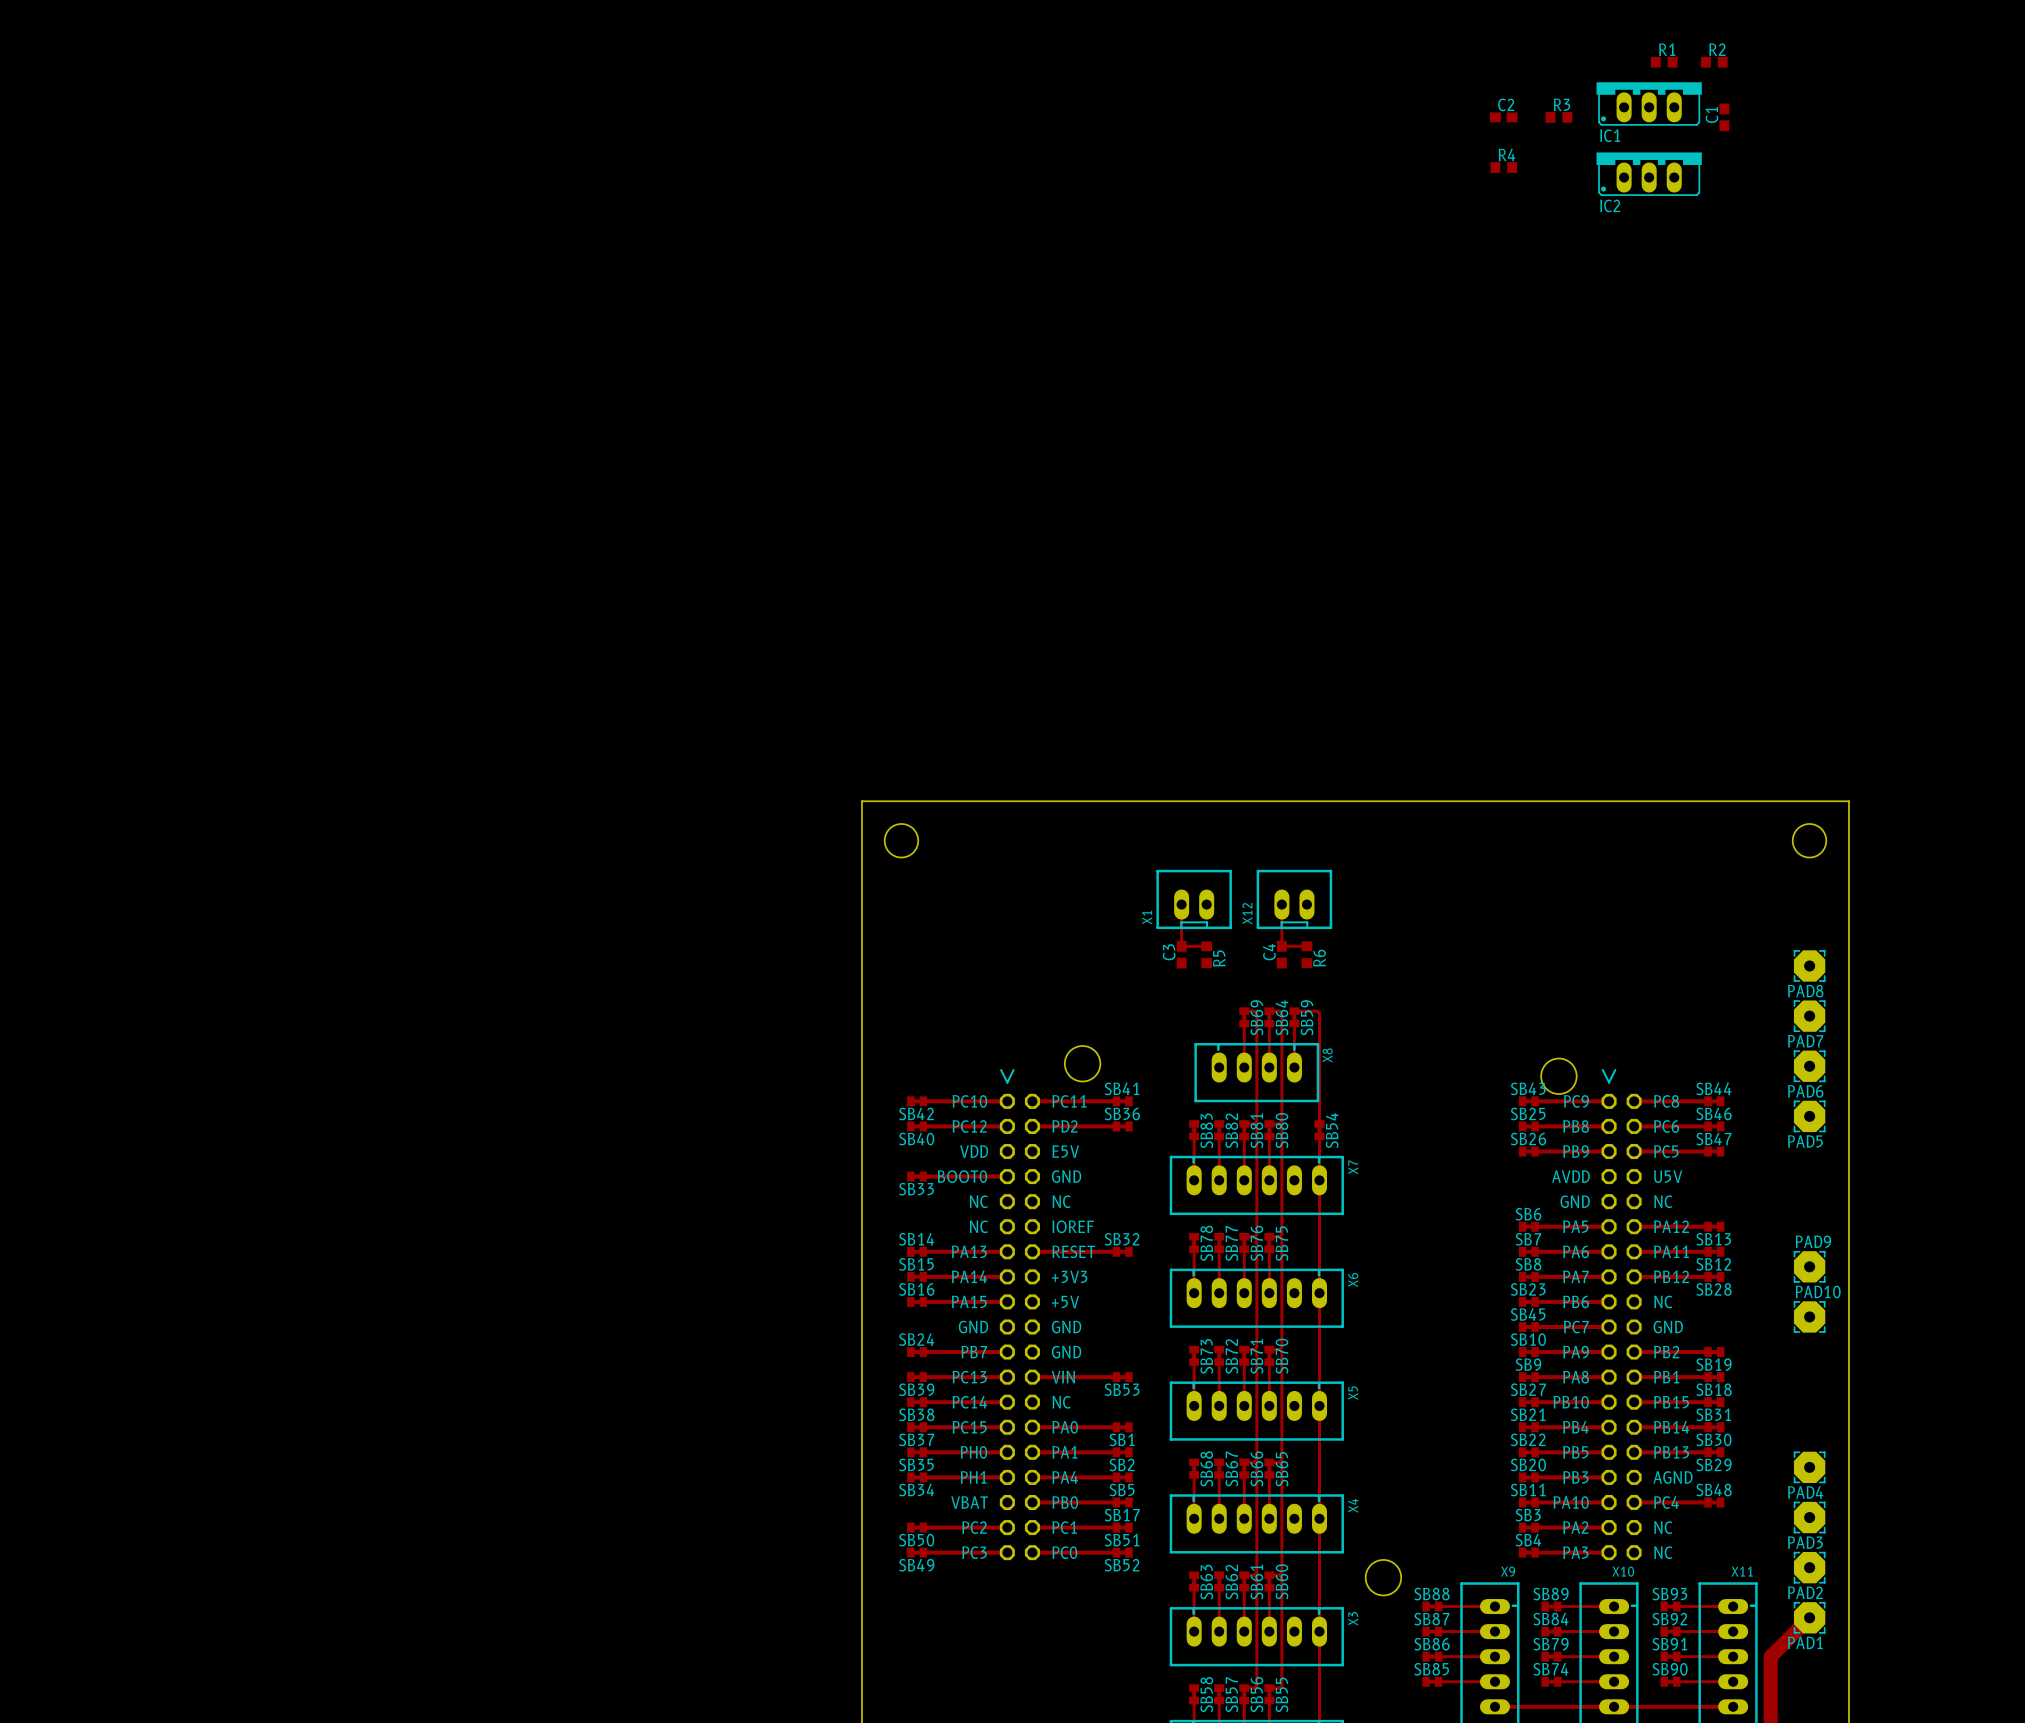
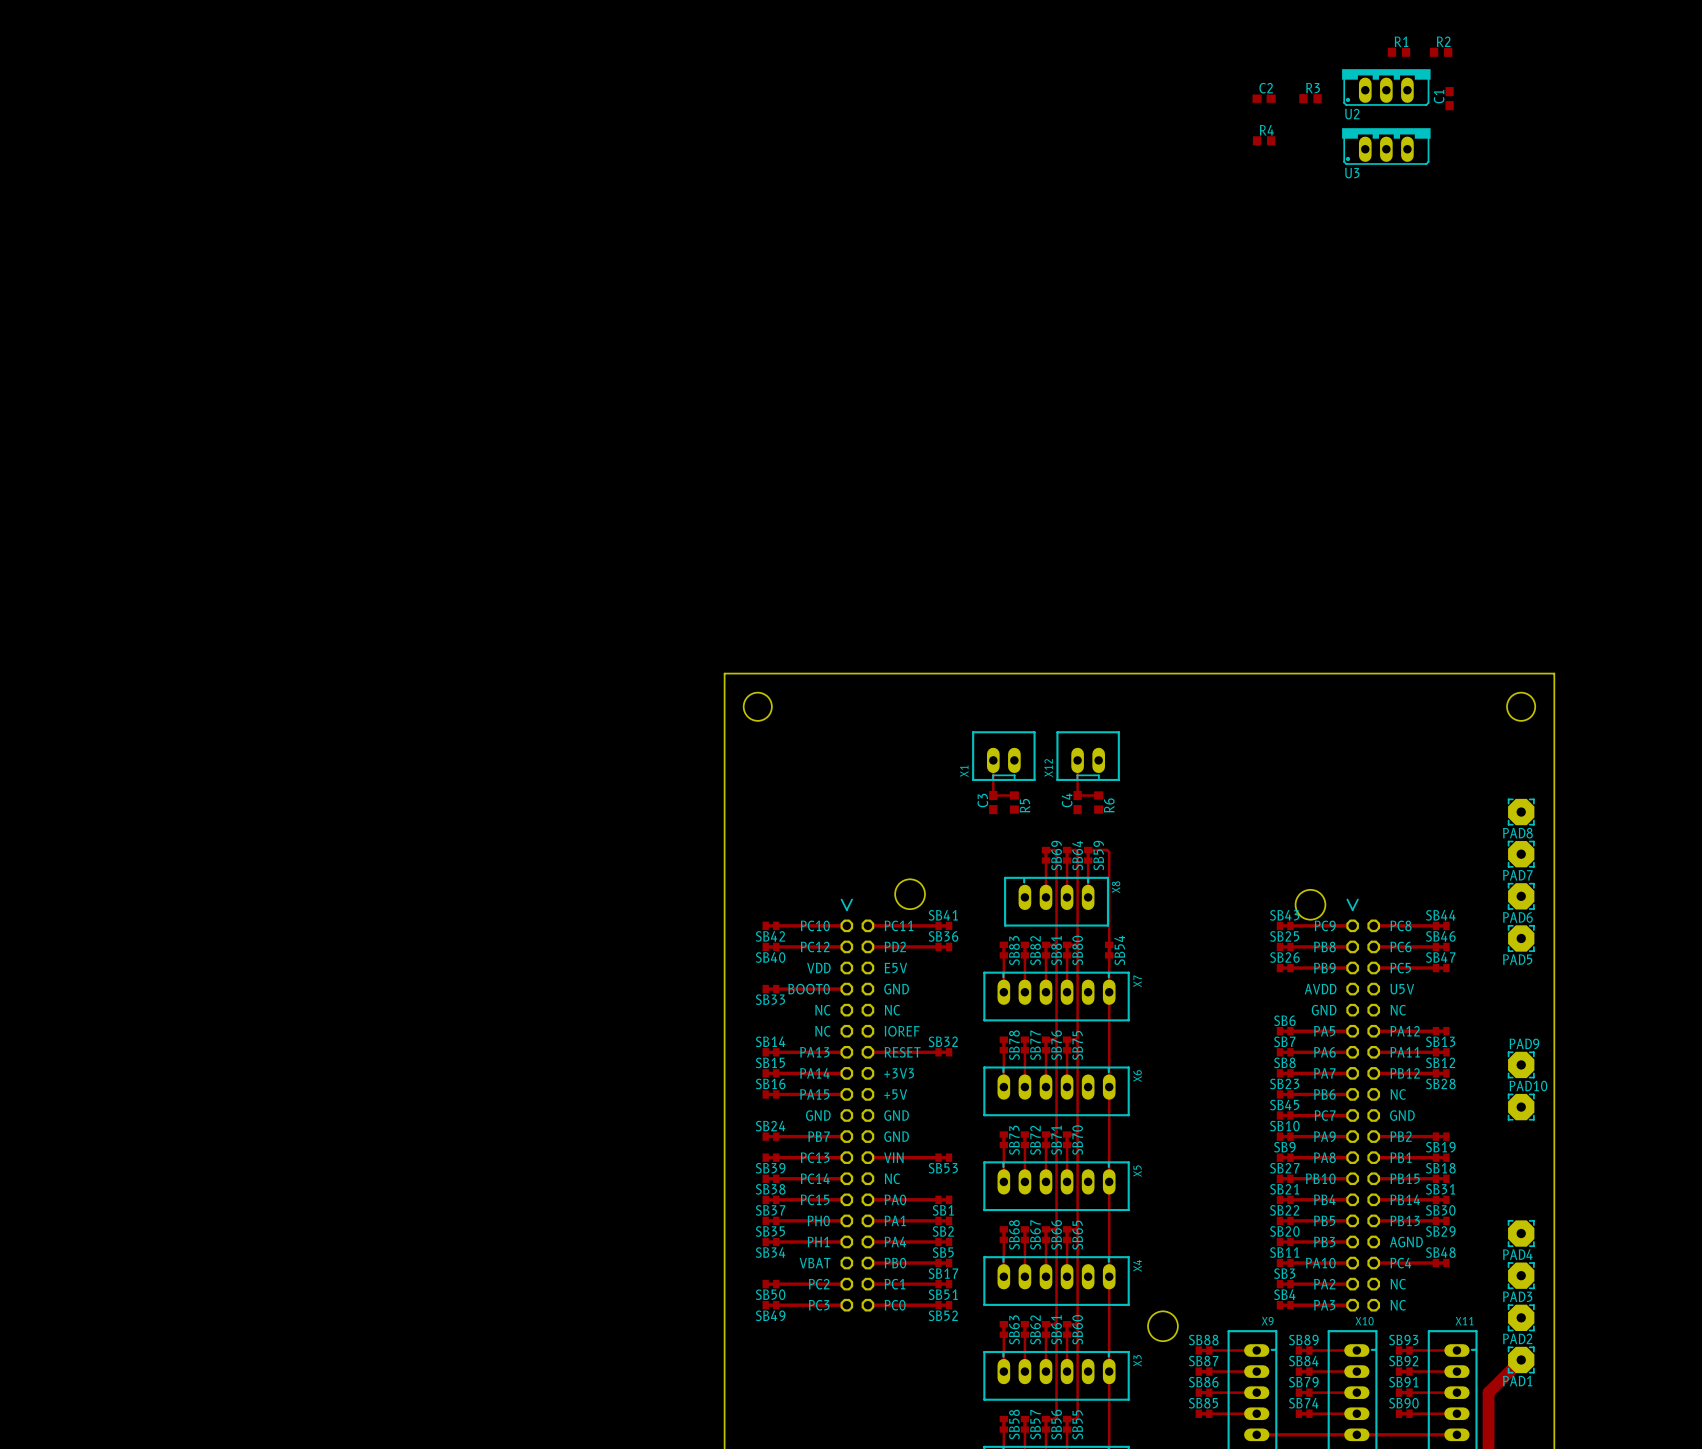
IC1 name: IC1 (1610, 135) -> U2 (1352, 114)
IC2 name: IC2 (1610, 205) -> U3 (1352, 173)

